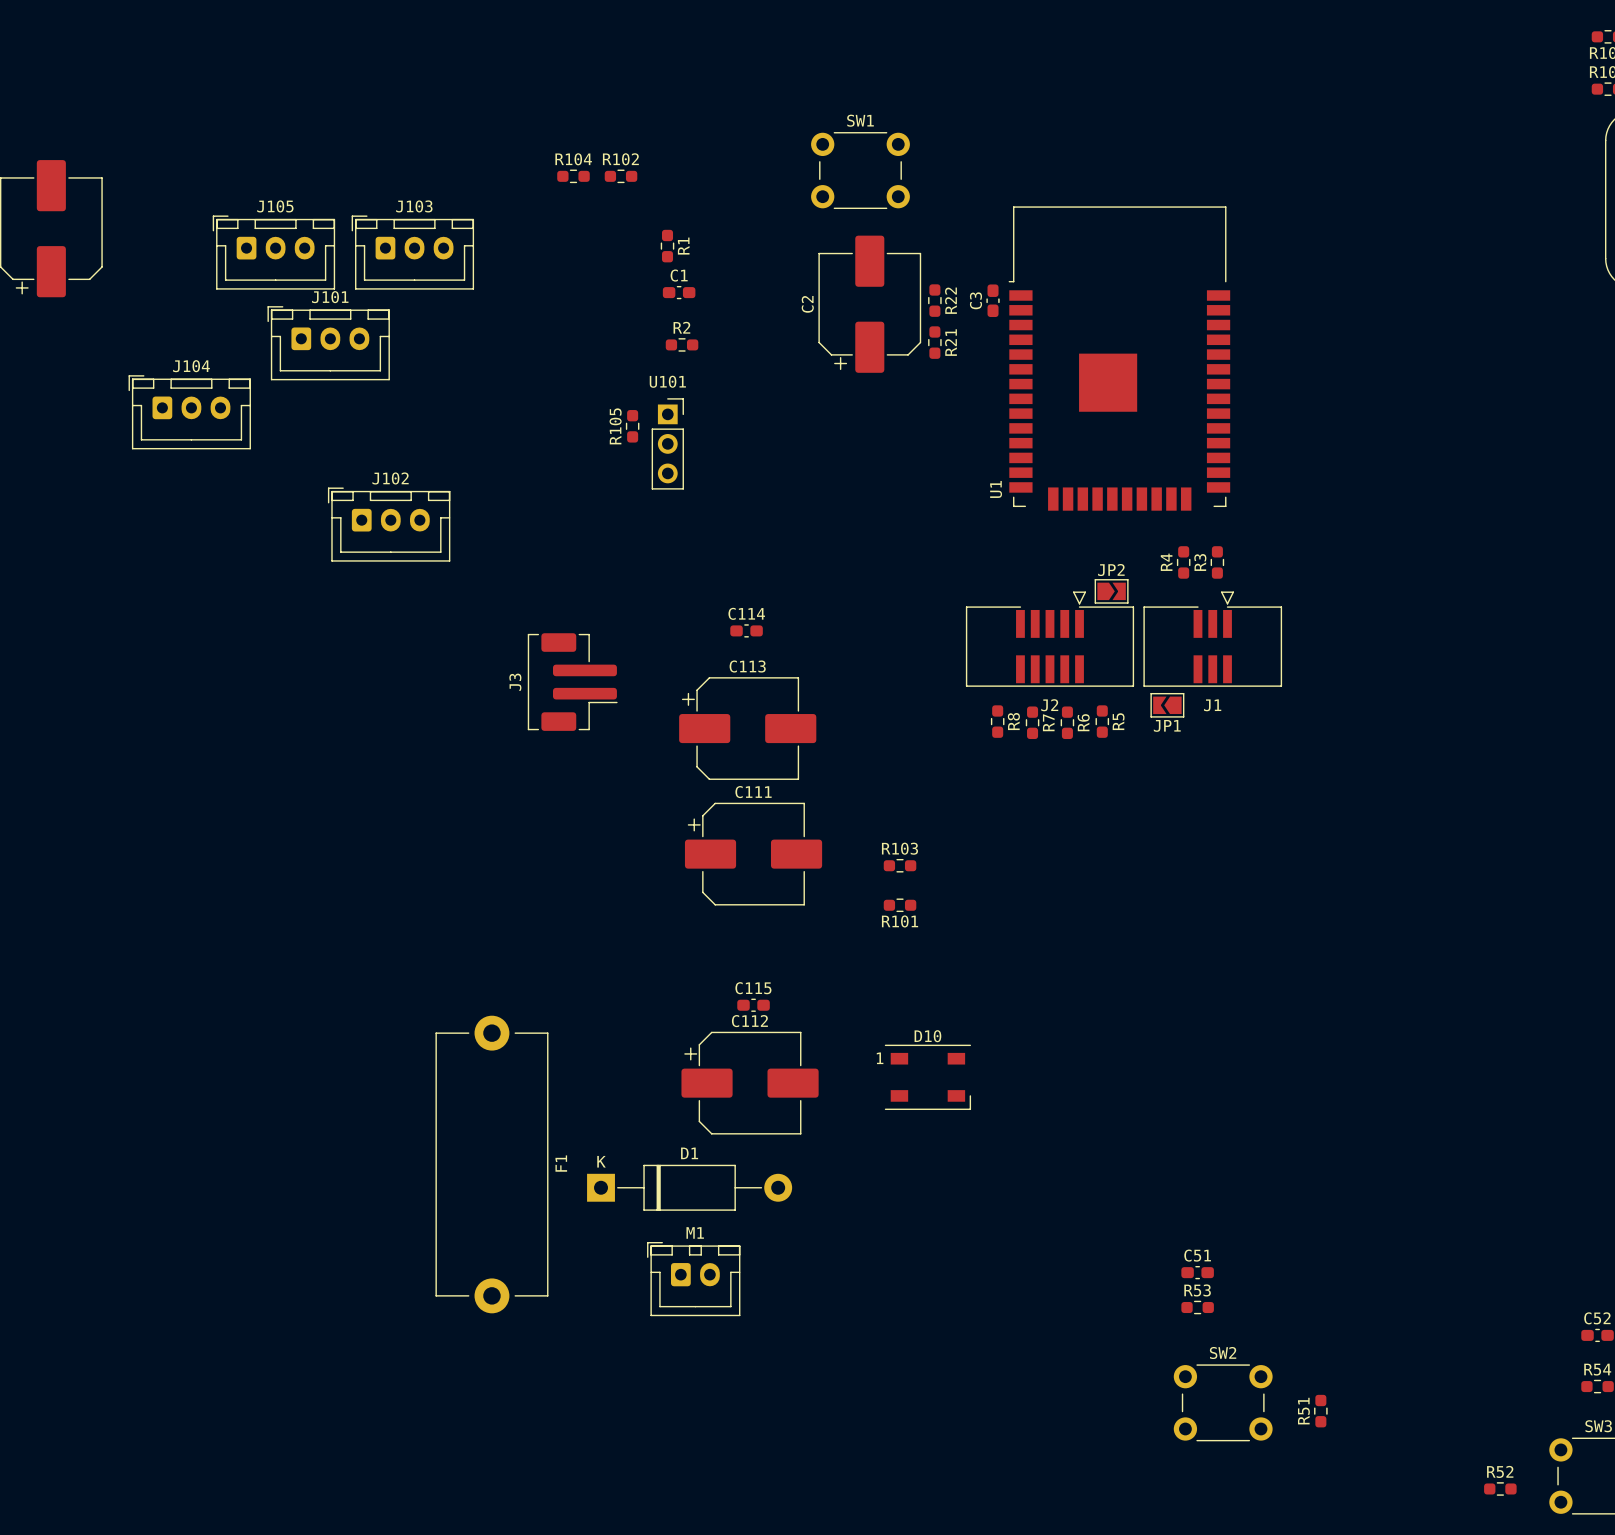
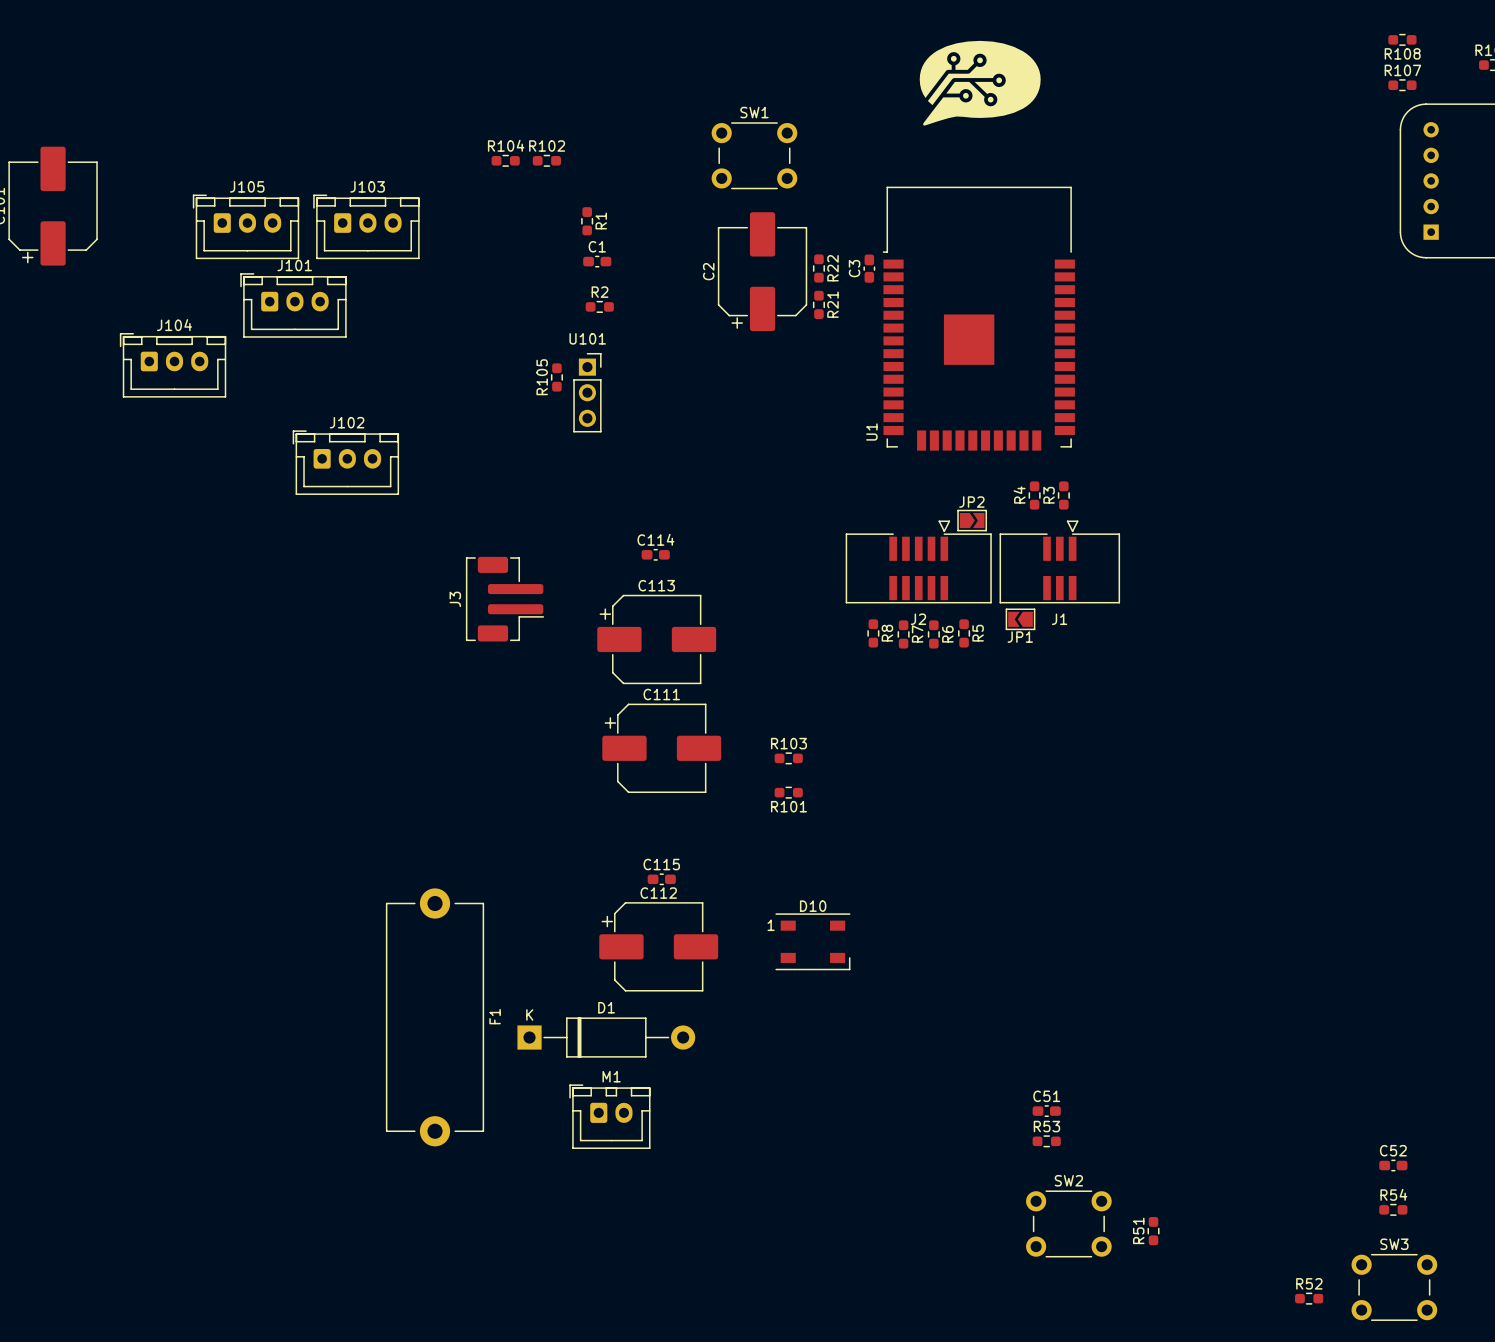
drawing: none -> [919, 40, 1041, 126]

